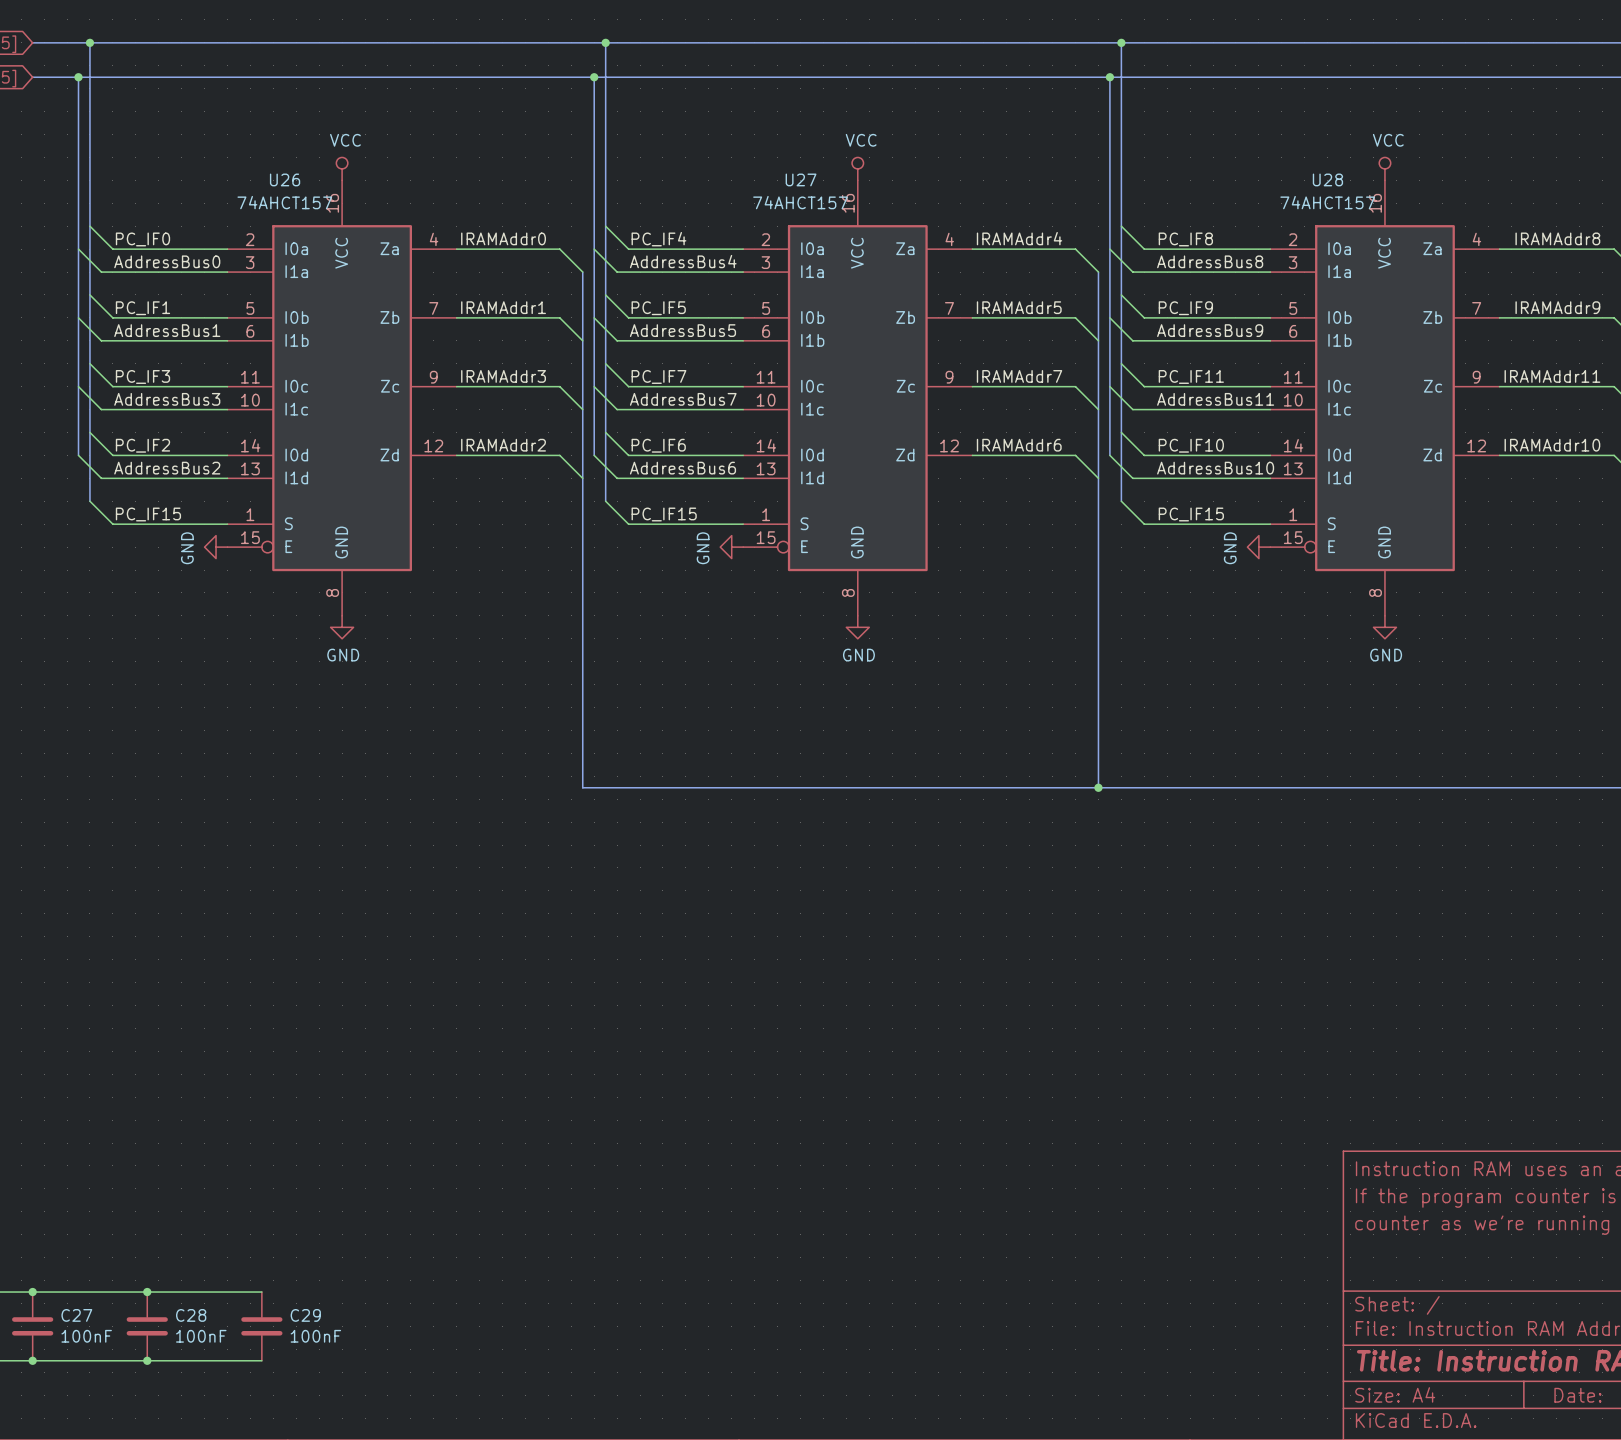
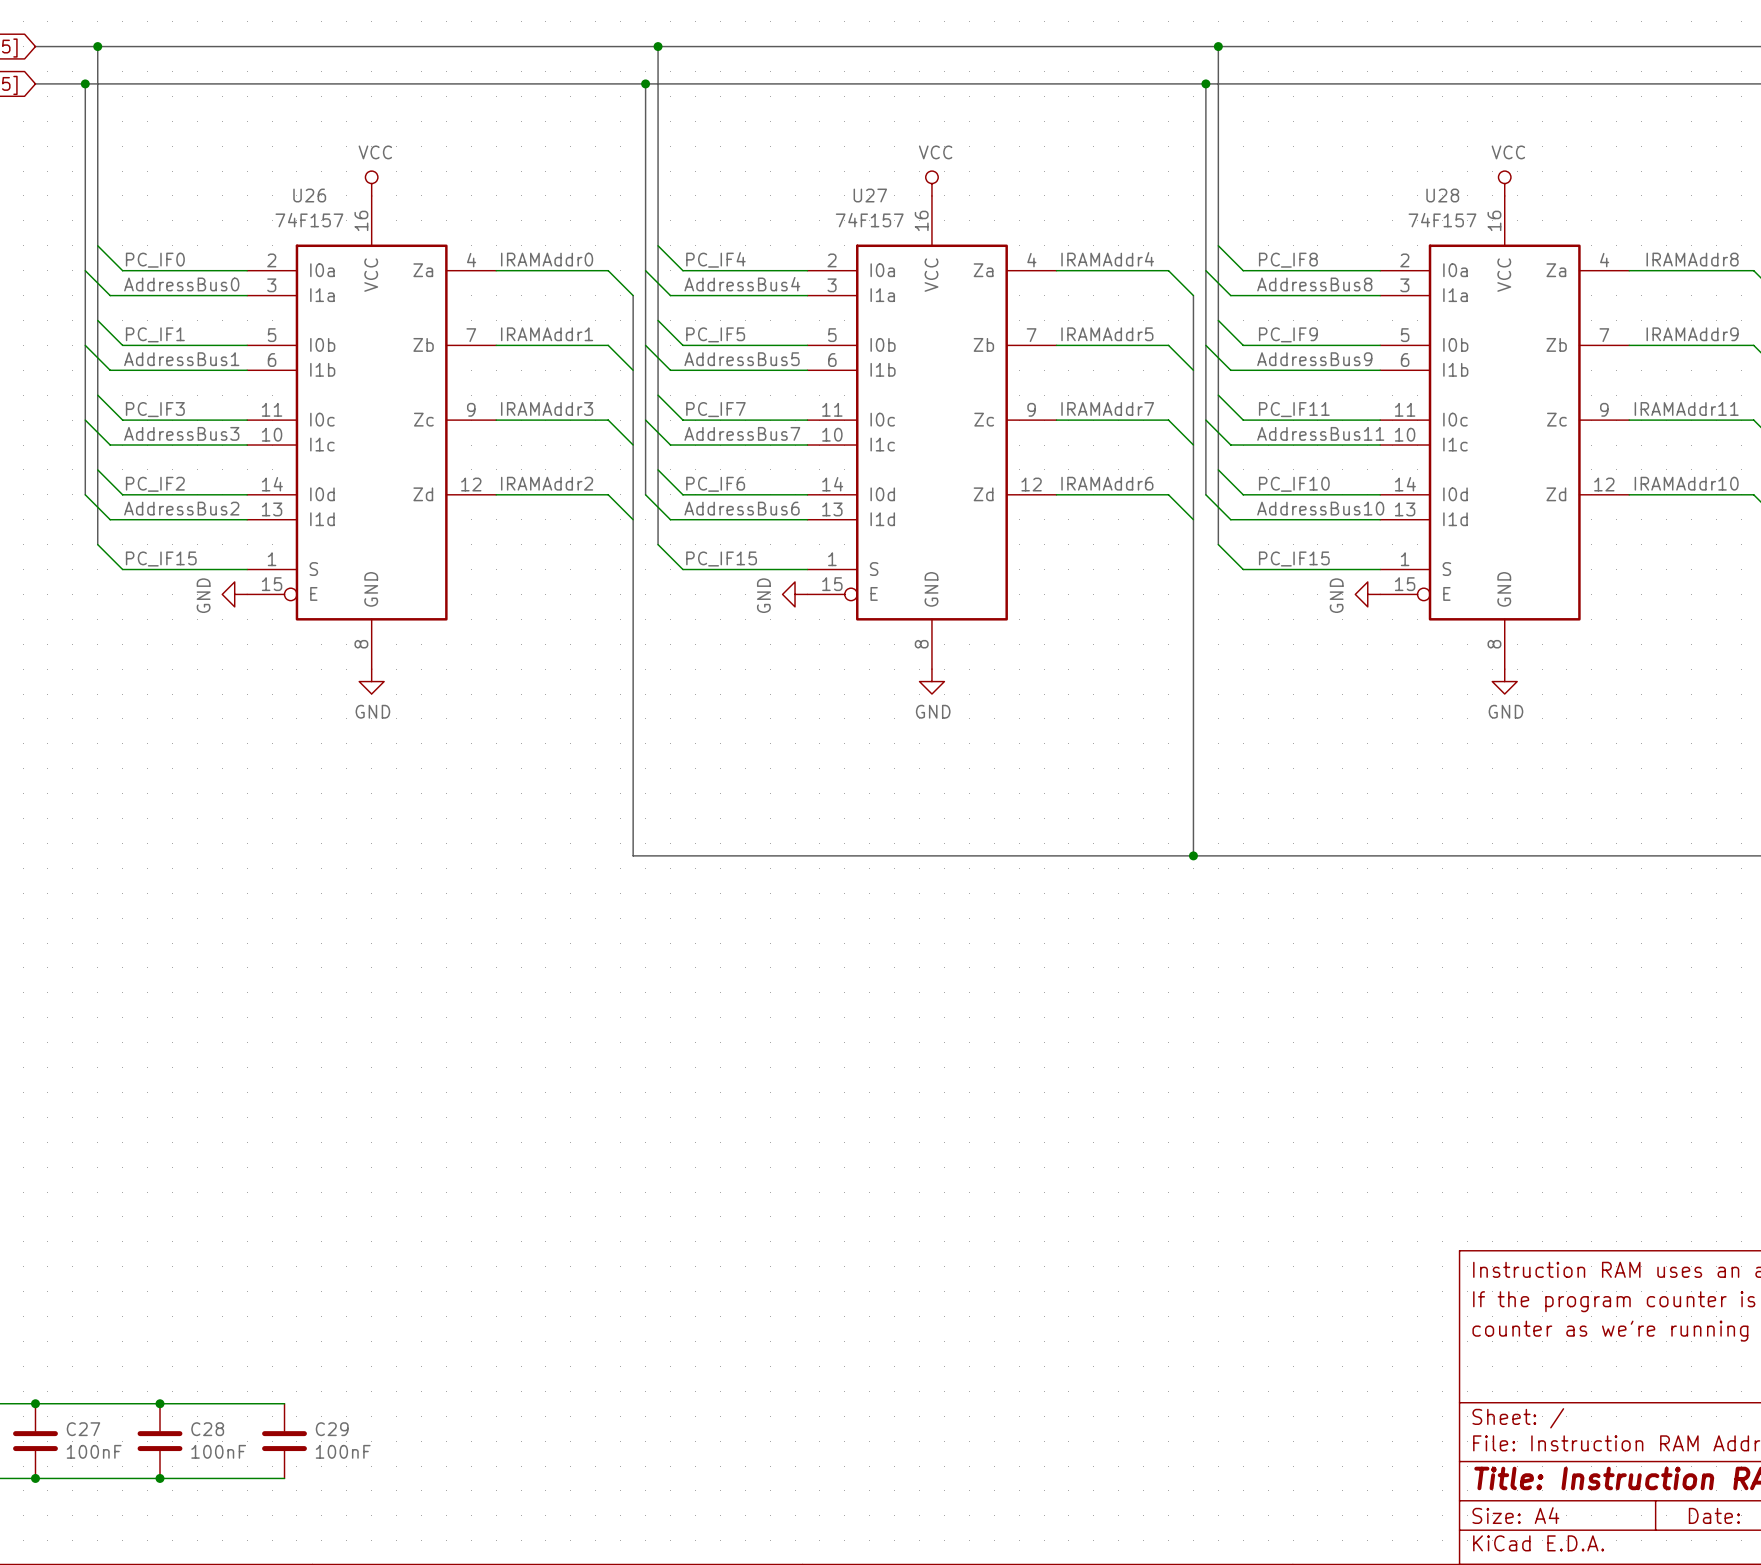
U26 value: 74AHCT157 (284, 202) -> 74F157 (309, 220)
U27 value: 74AHCT157 (800, 202) -> 74F157 (869, 220)
U28 value: 74AHCT157 (1327, 202) -> 74F157 (1442, 220)

